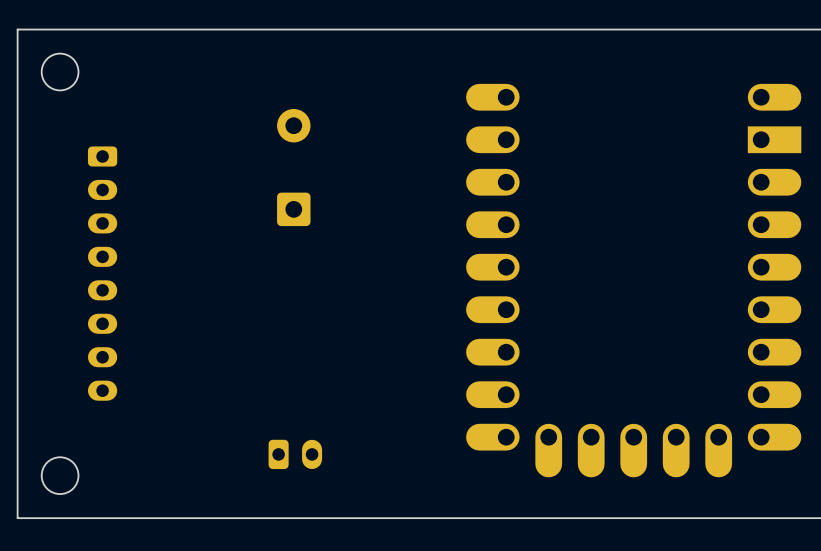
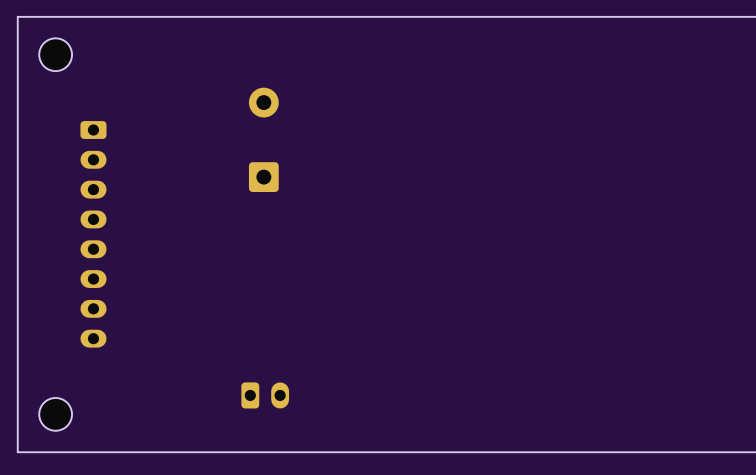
part: (633, 280) -> none

